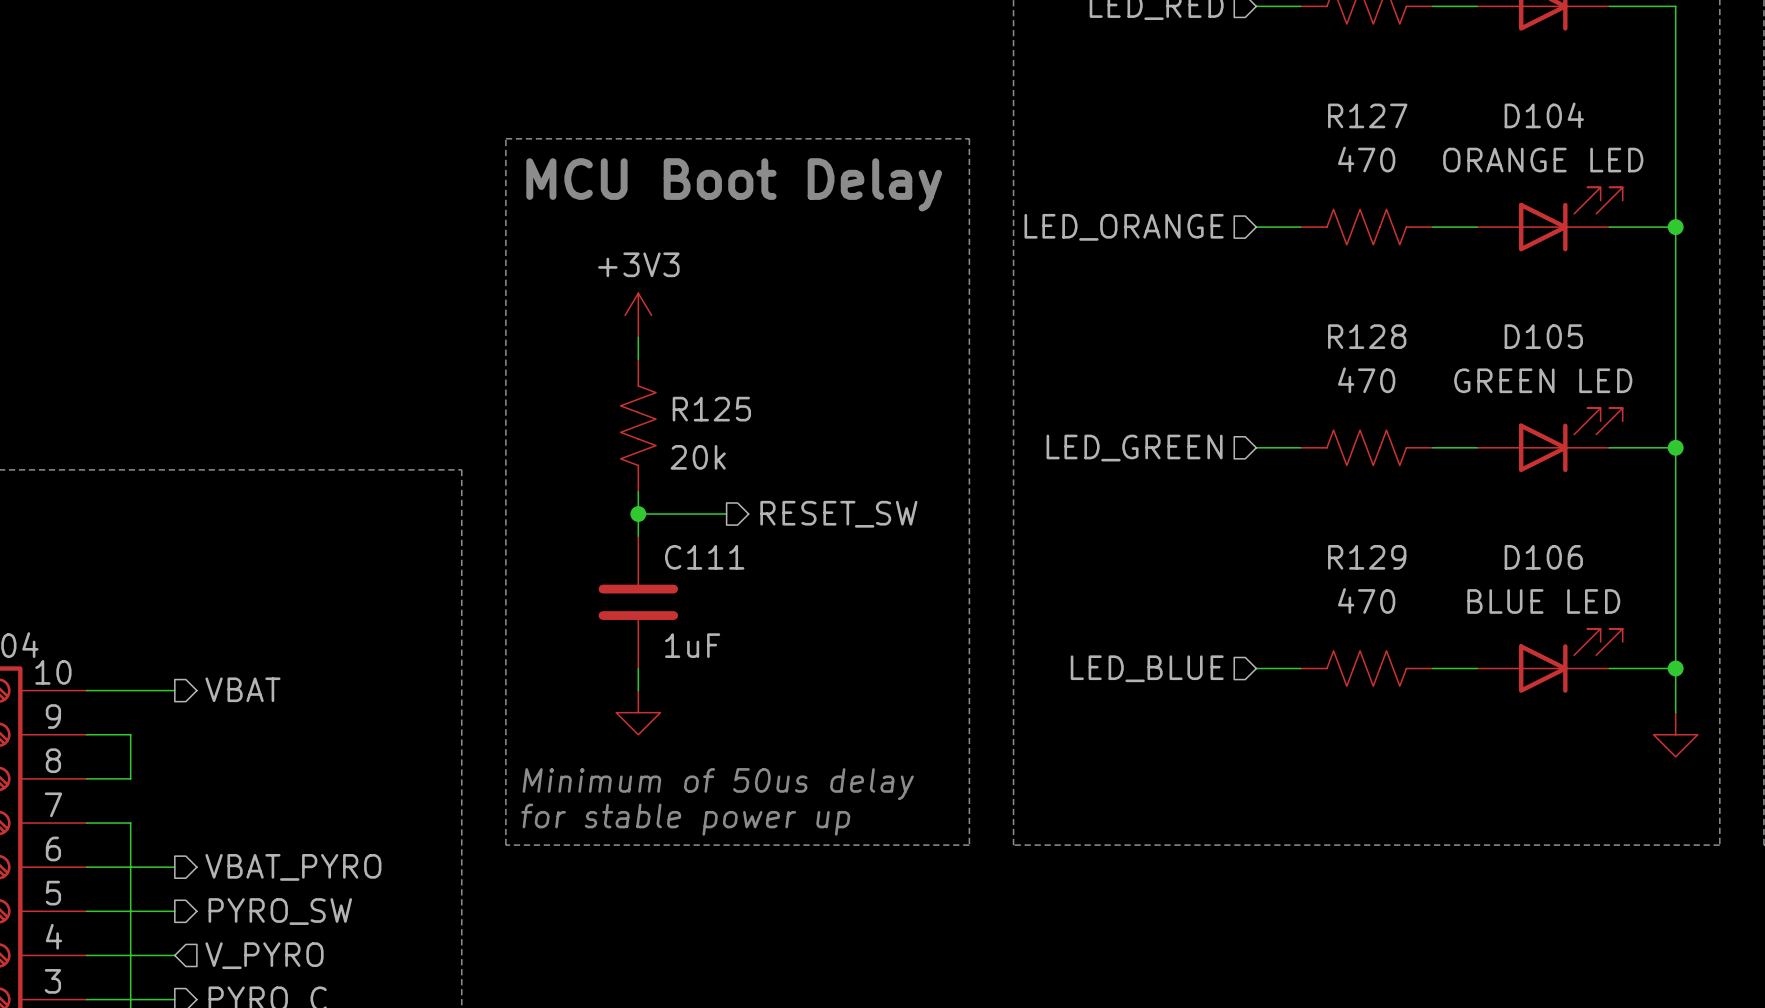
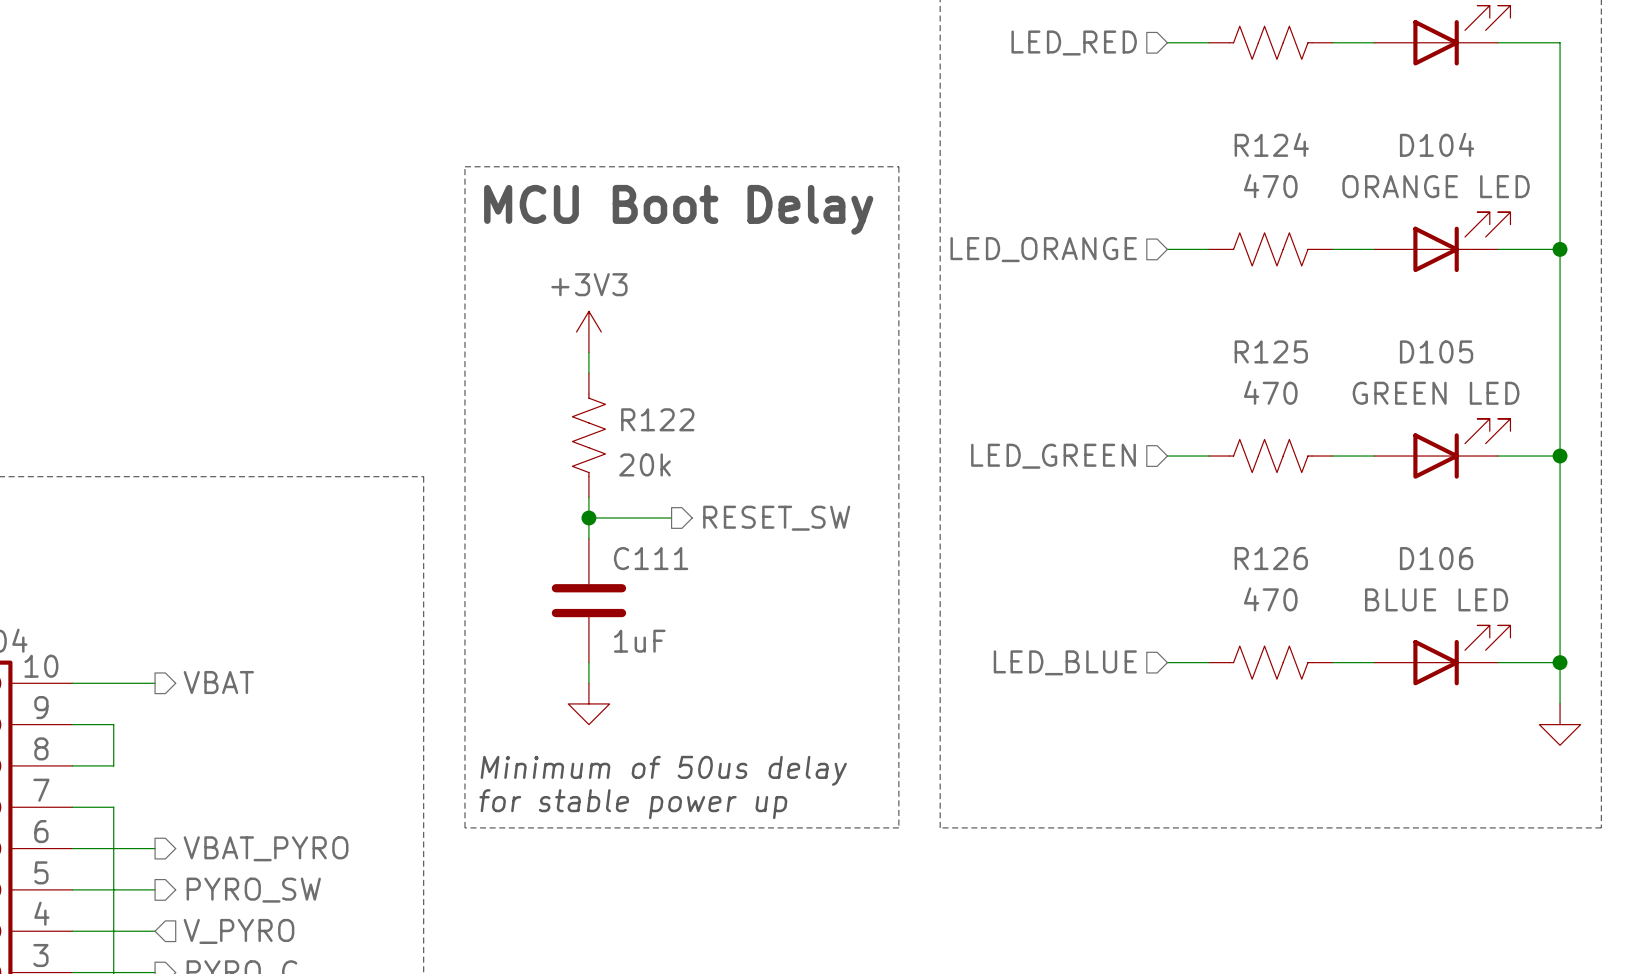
R127 name: R127 (1367, 115) -> R124 (1271, 144)
R128 name: R128 (1367, 336) -> R125 (1271, 351)
R125 name: R125 (711, 409) -> R122 (657, 419)
R129 name: R129 (1367, 557) -> R126 (1271, 558)

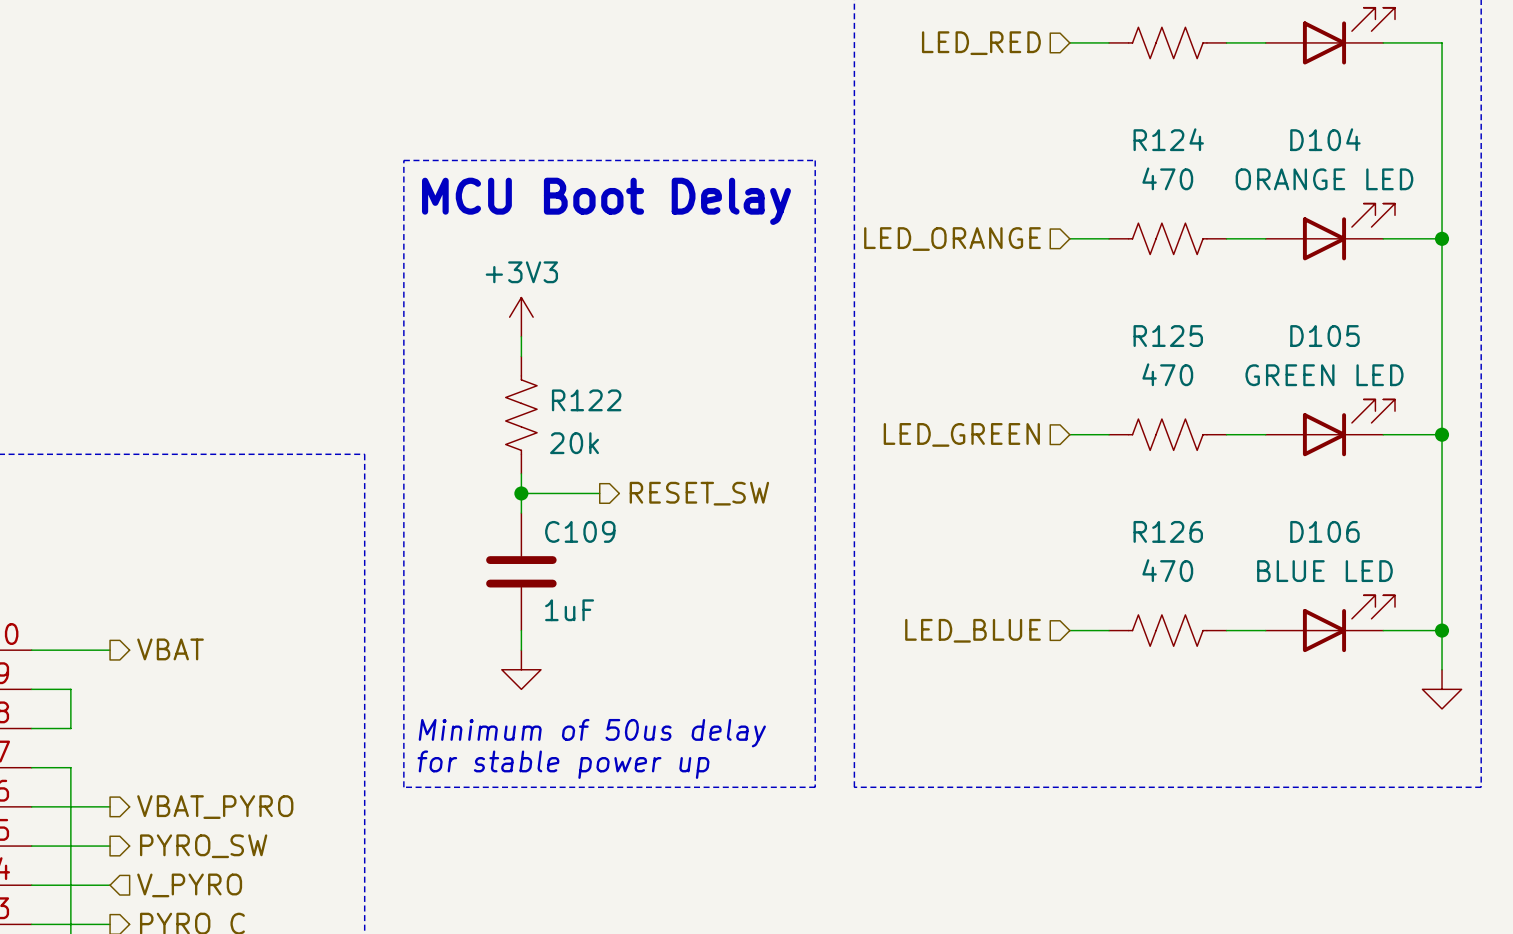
C111 name: C111 (651, 558) -> C109 (580, 531)

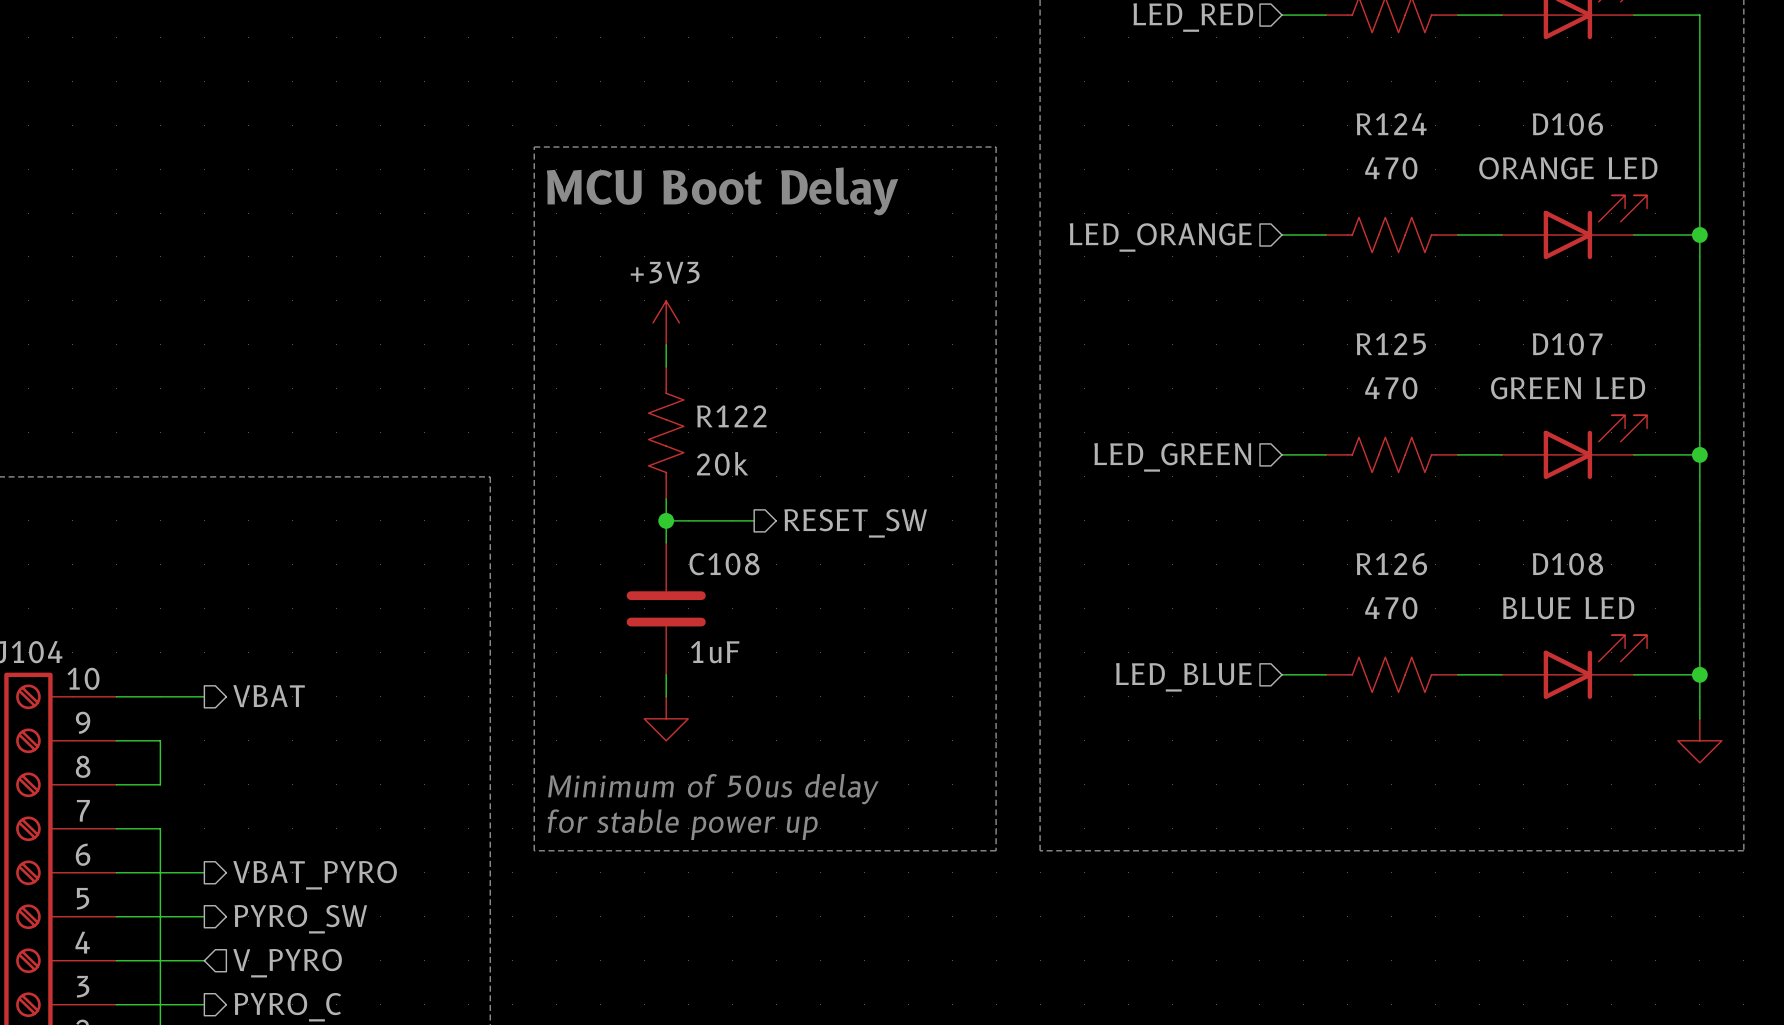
D104 name: D104 (1325, 139) -> D106 (1567, 124)
D105 name: D105 (1324, 336) -> D107 (1567, 344)
C109 name: C109 (580, 531) -> C108 (724, 564)
D106 name: D106 (1324, 531) -> D108 (1567, 564)

